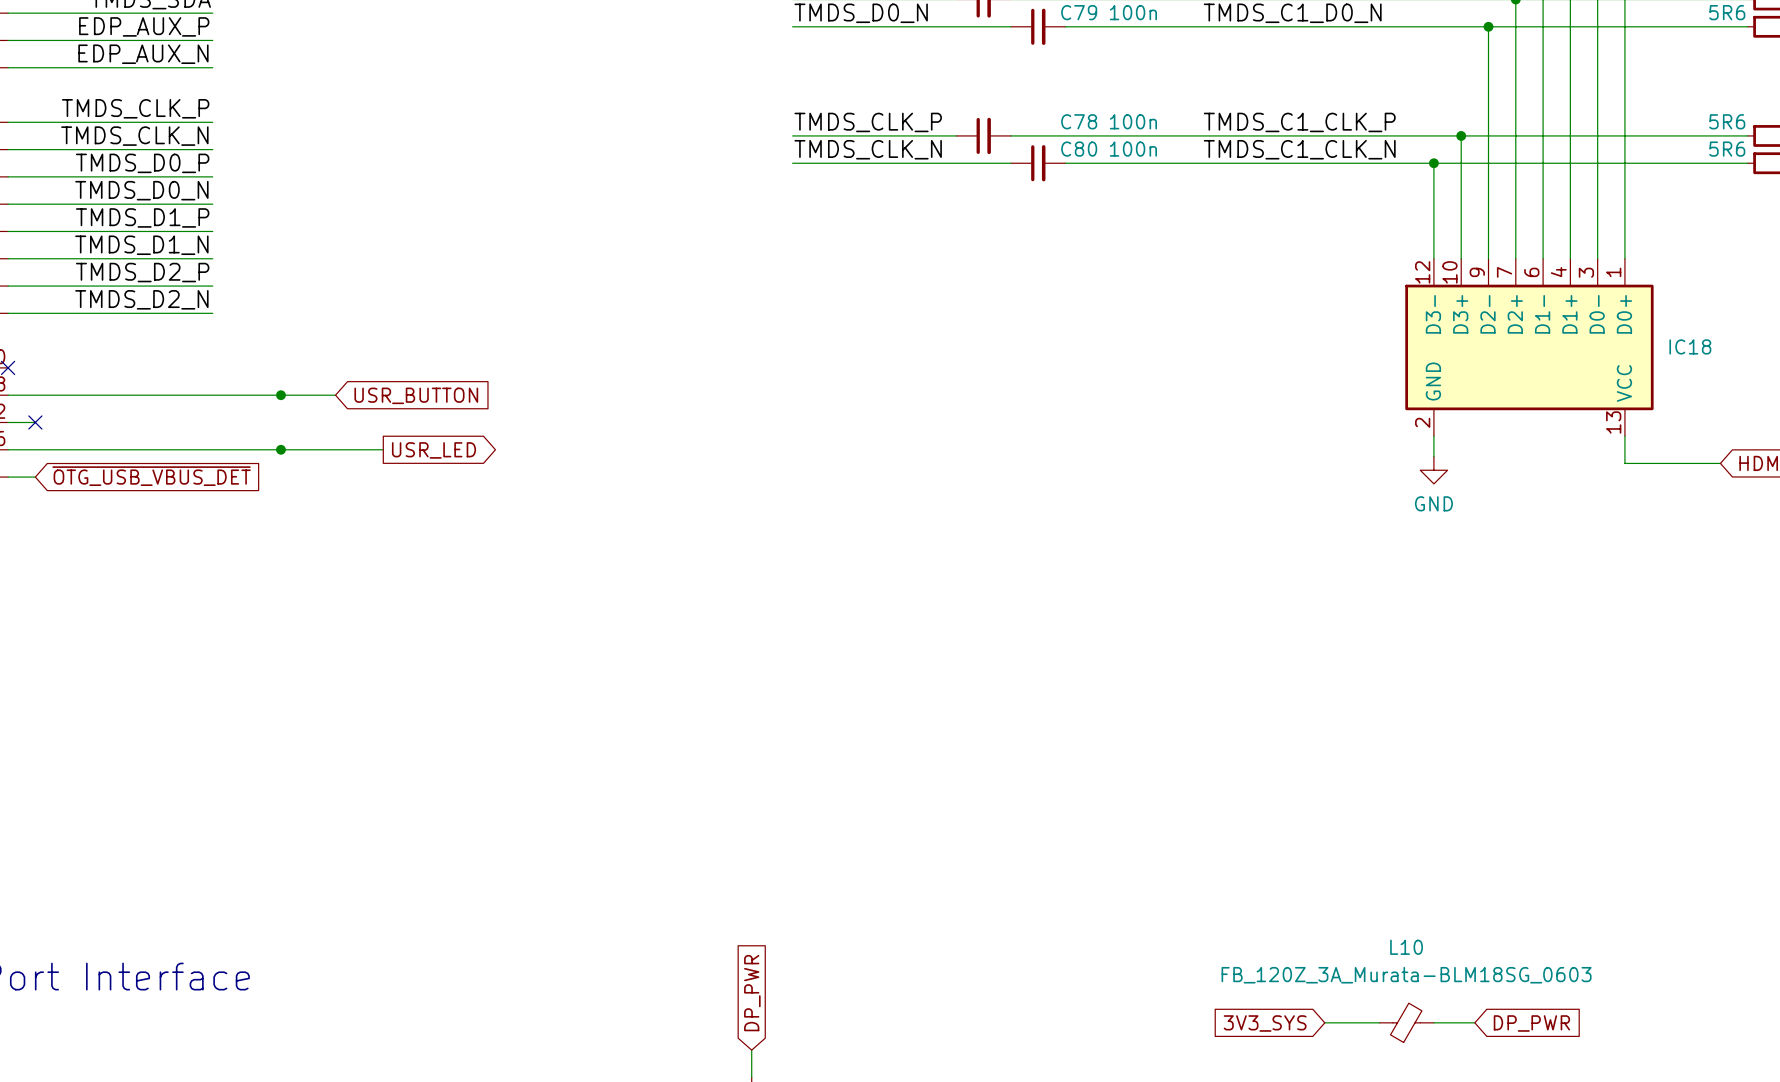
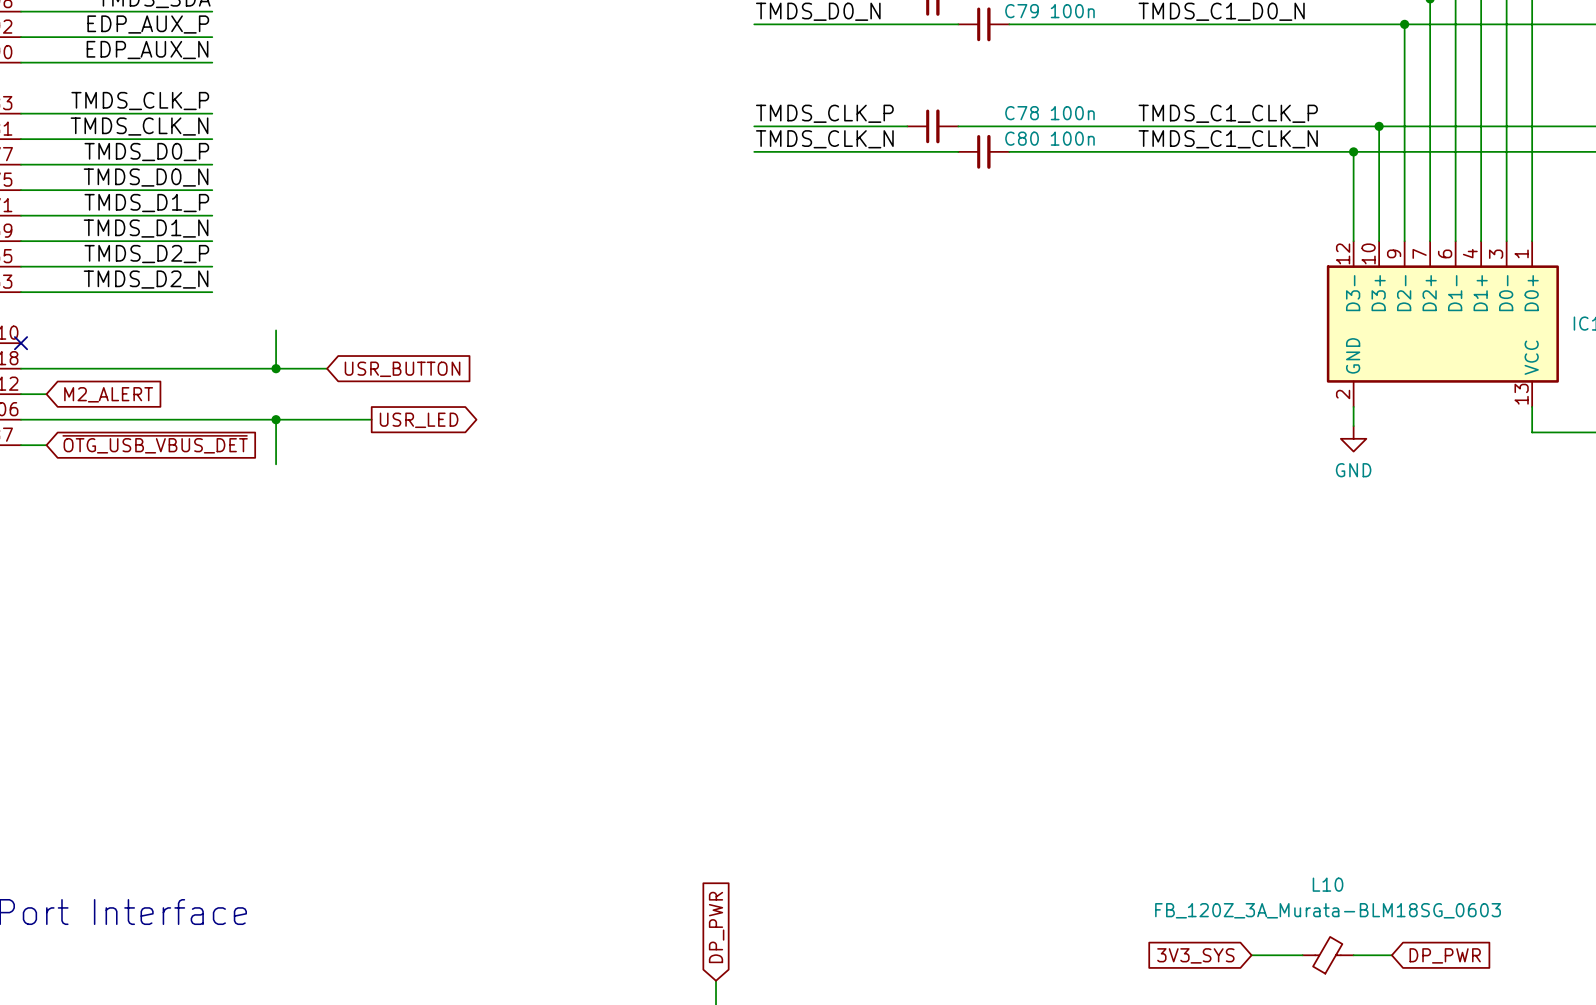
wire: none -> (276, 330) (276, 368)
no-connect mark: (35, 422) -> none
global label: none -> M2_ALERT (108, 394)
wire: none -> (276, 419) (276, 464)

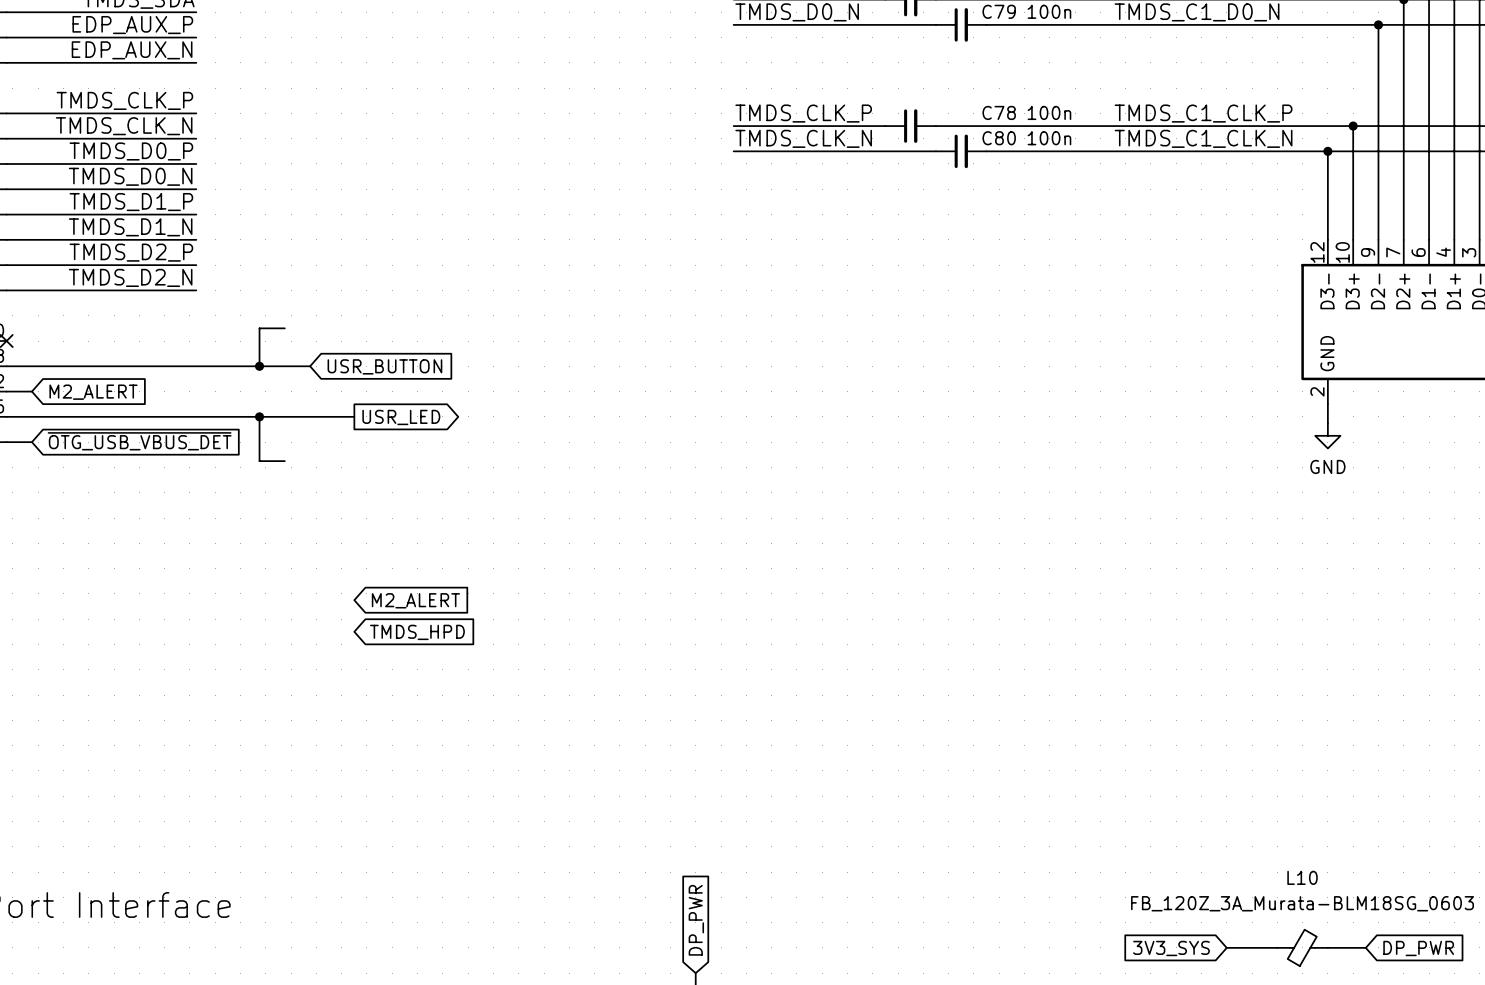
wire: none -> (259, 328) (284, 328)
wire: none -> (259, 461) (284, 461)
global label: none -> M2_ALERT (415, 600)
global label: none -> TMDS_HPD (417, 632)

